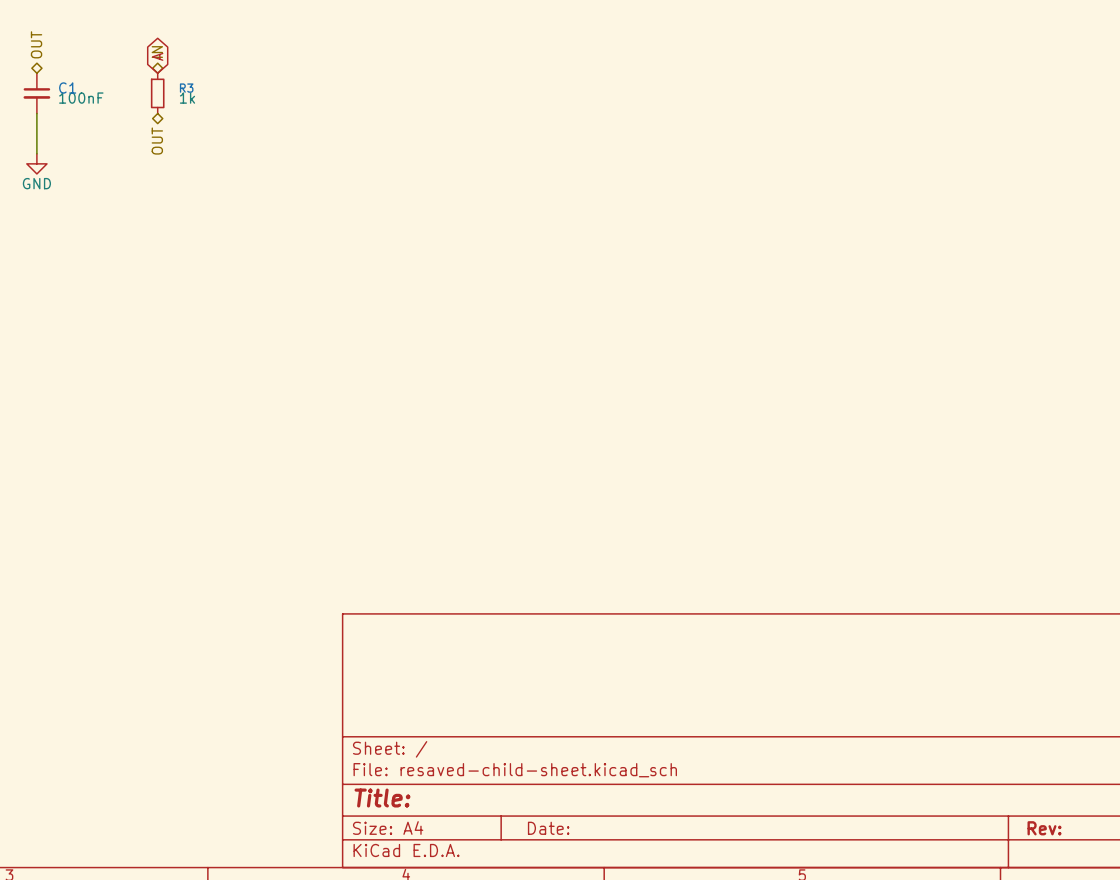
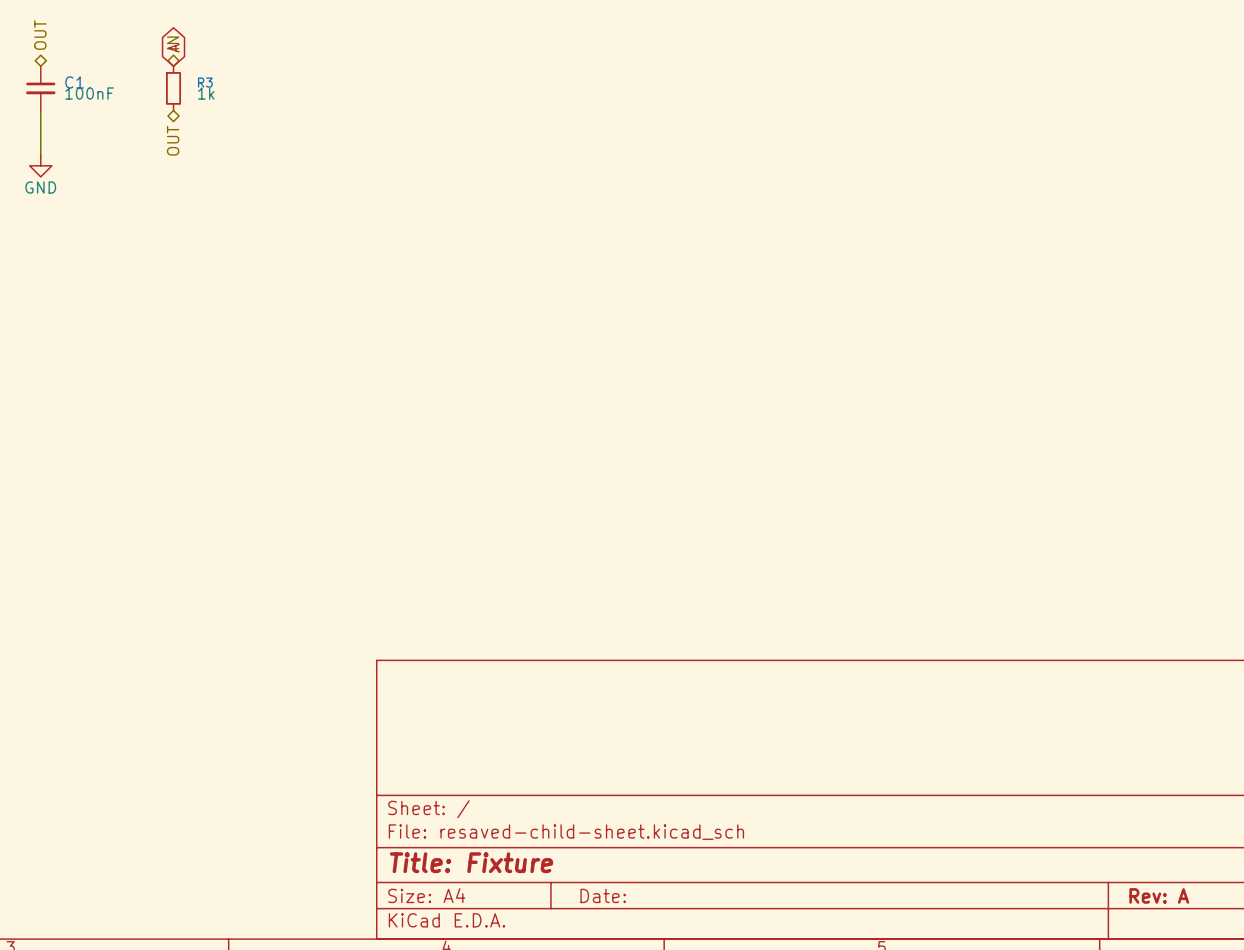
title block: Title: (382, 798) -> Title: Fixture (471, 862)
title block: Rev: (1044, 828) -> Rev: A (1159, 895)

